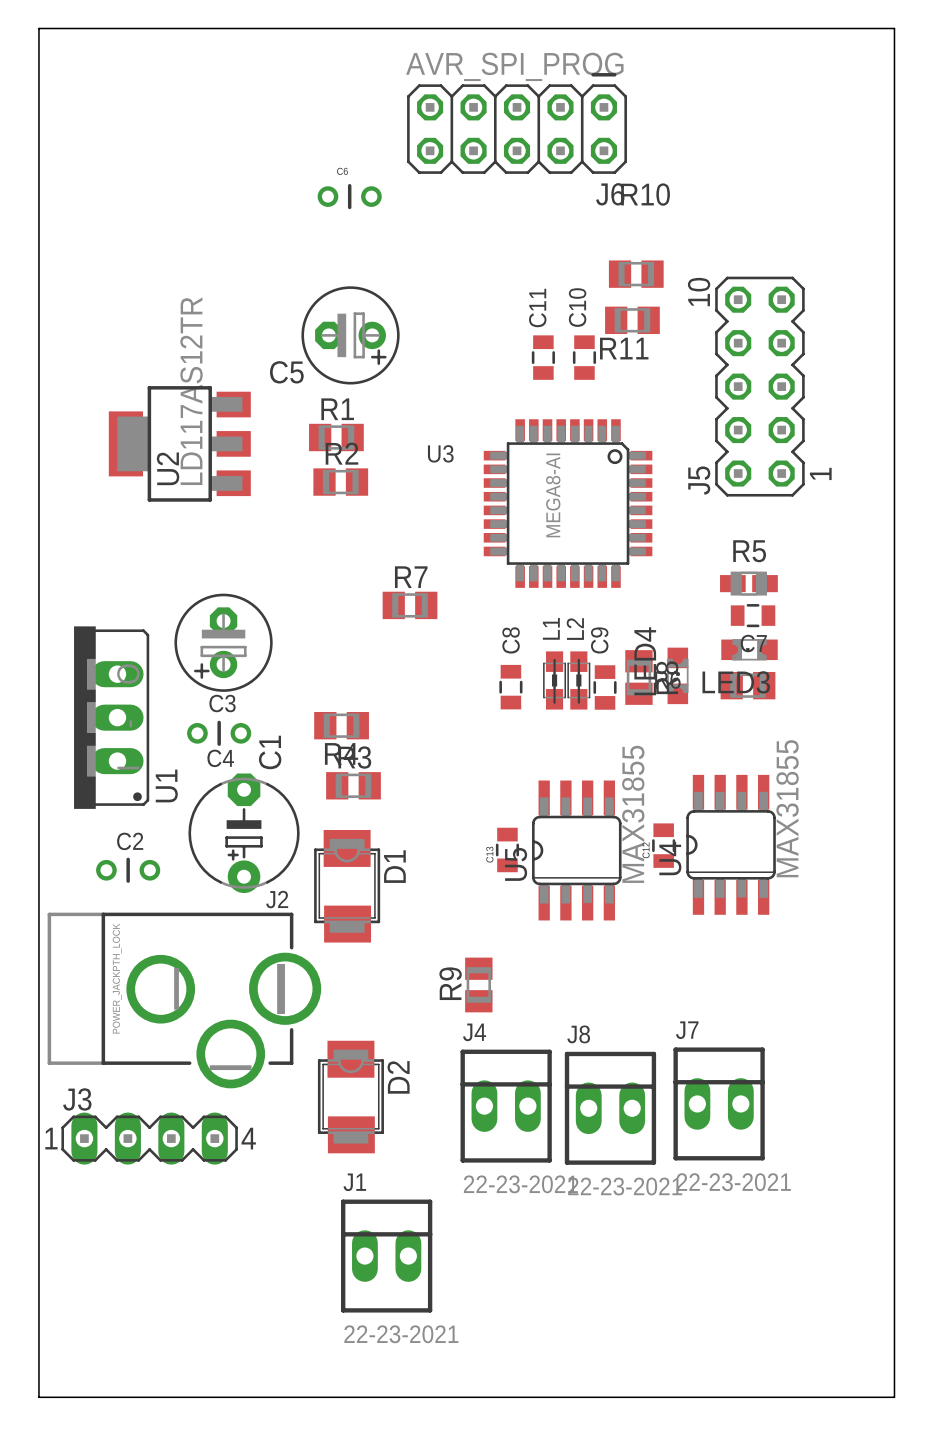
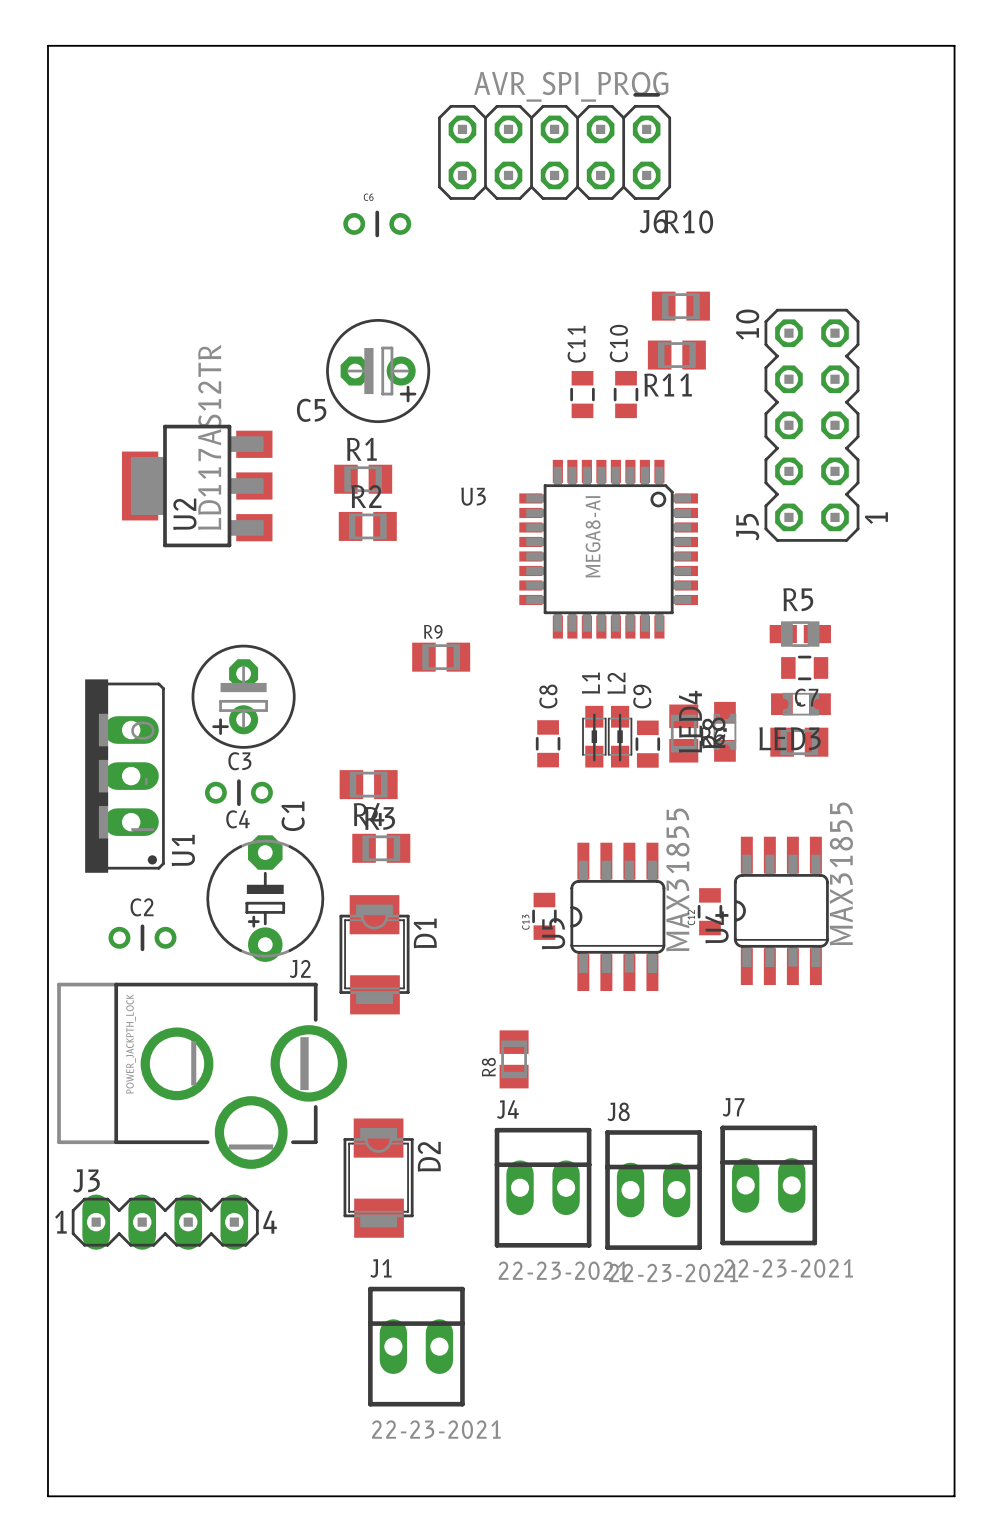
R7 name: R7 (411, 577) -> R9 (433, 631)
R9 name: R9 (450, 983) -> R8 (488, 1067)

